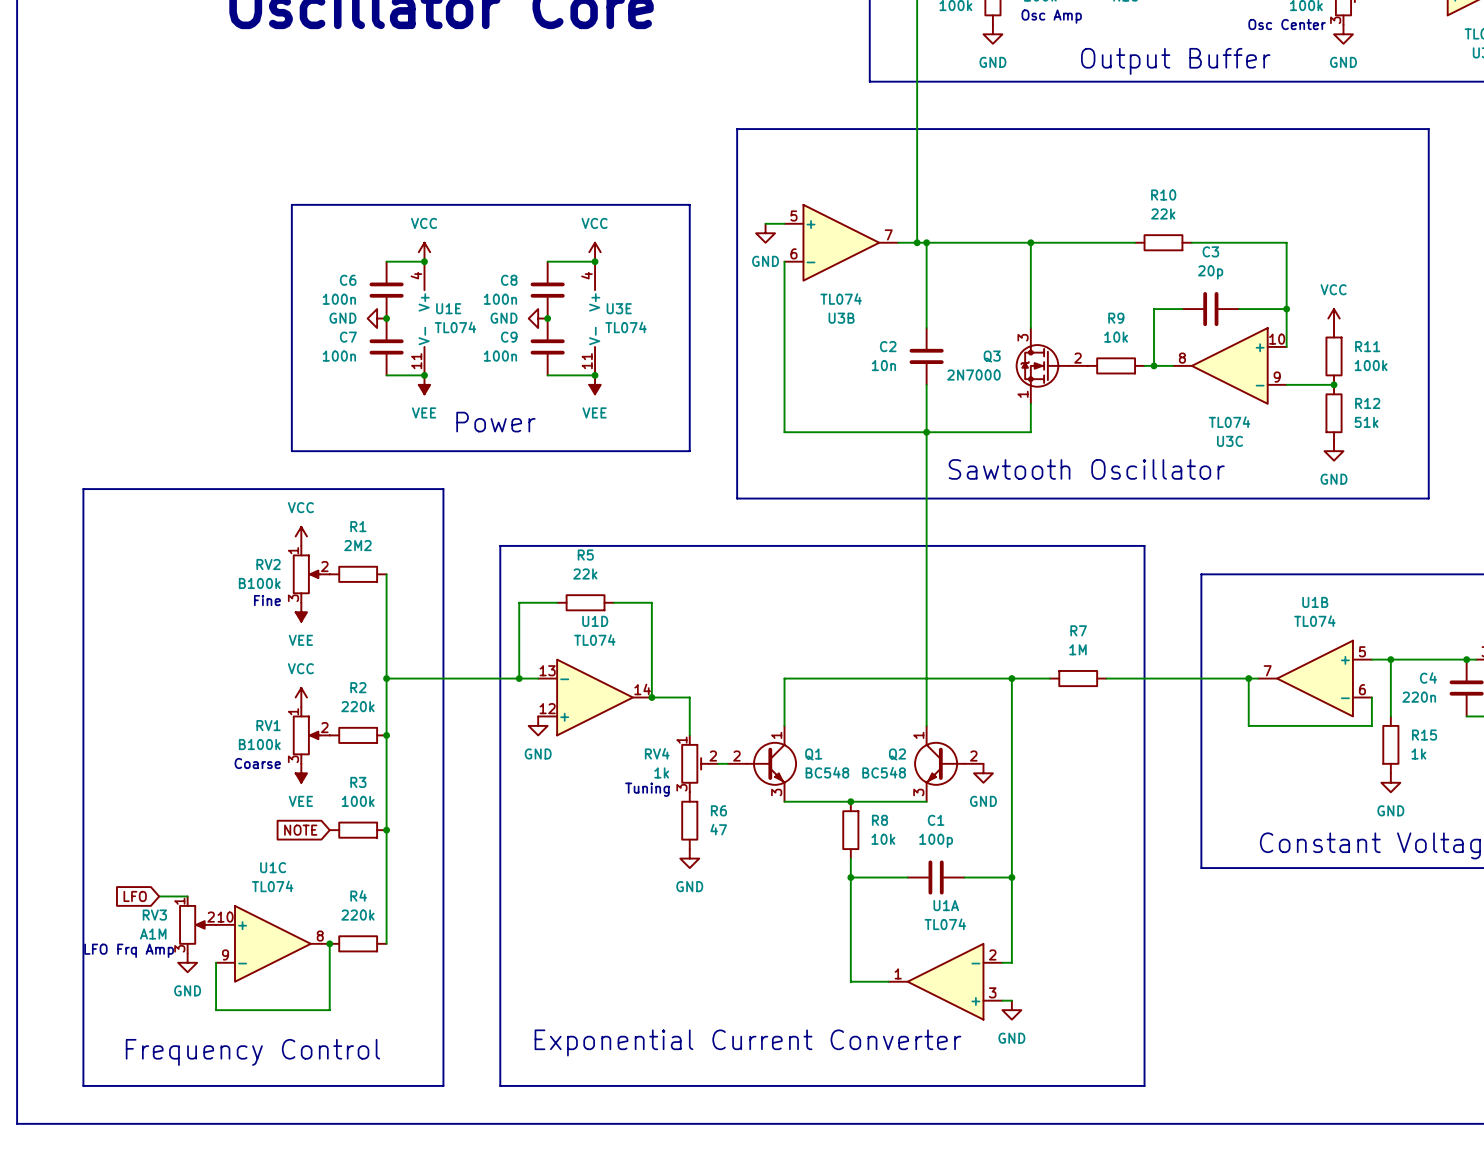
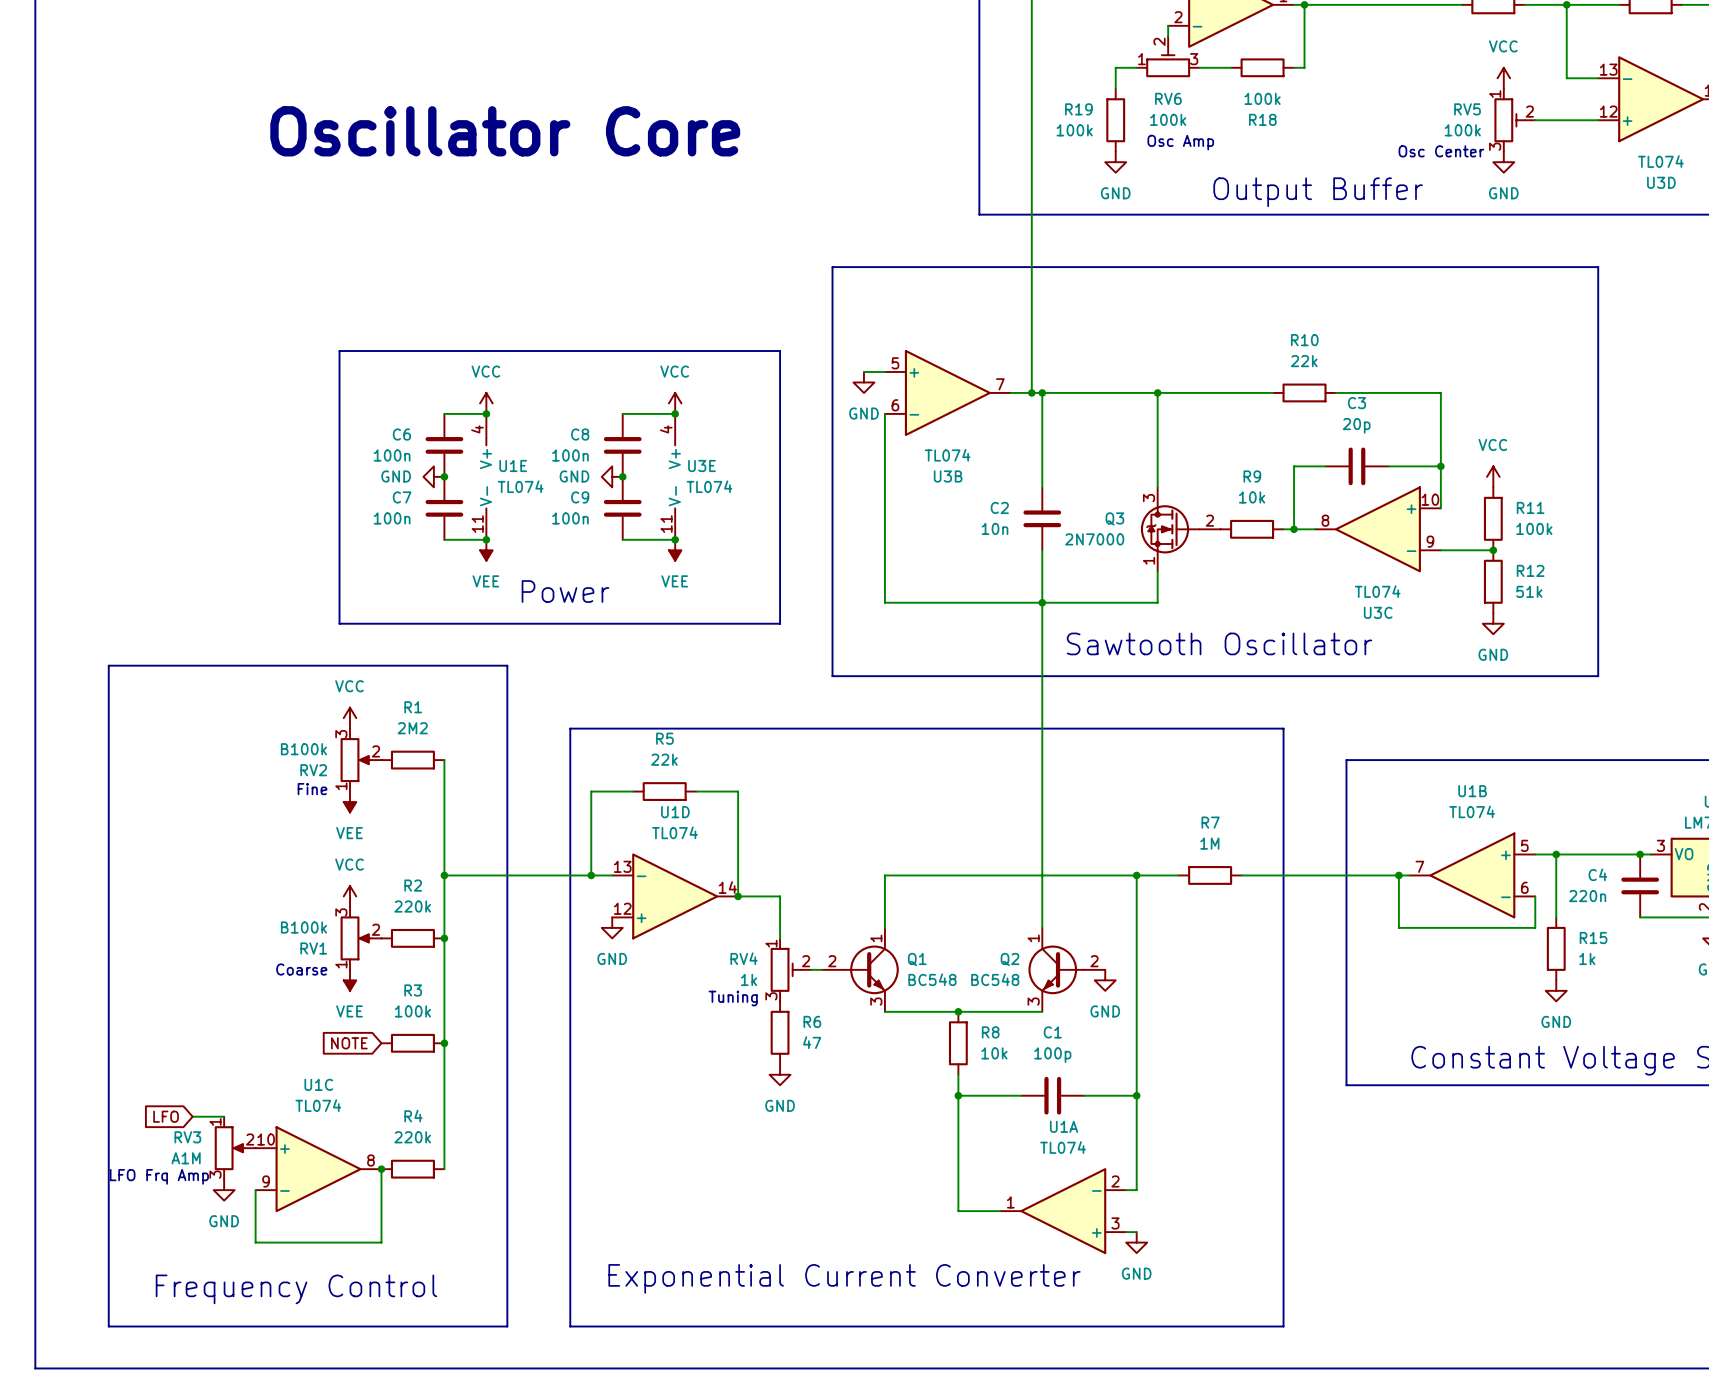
RV2 flip: as is (306, 574) -> up-down (355, 760)
RV1 flip: as is (306, 735) -> up-down (355, 938)

